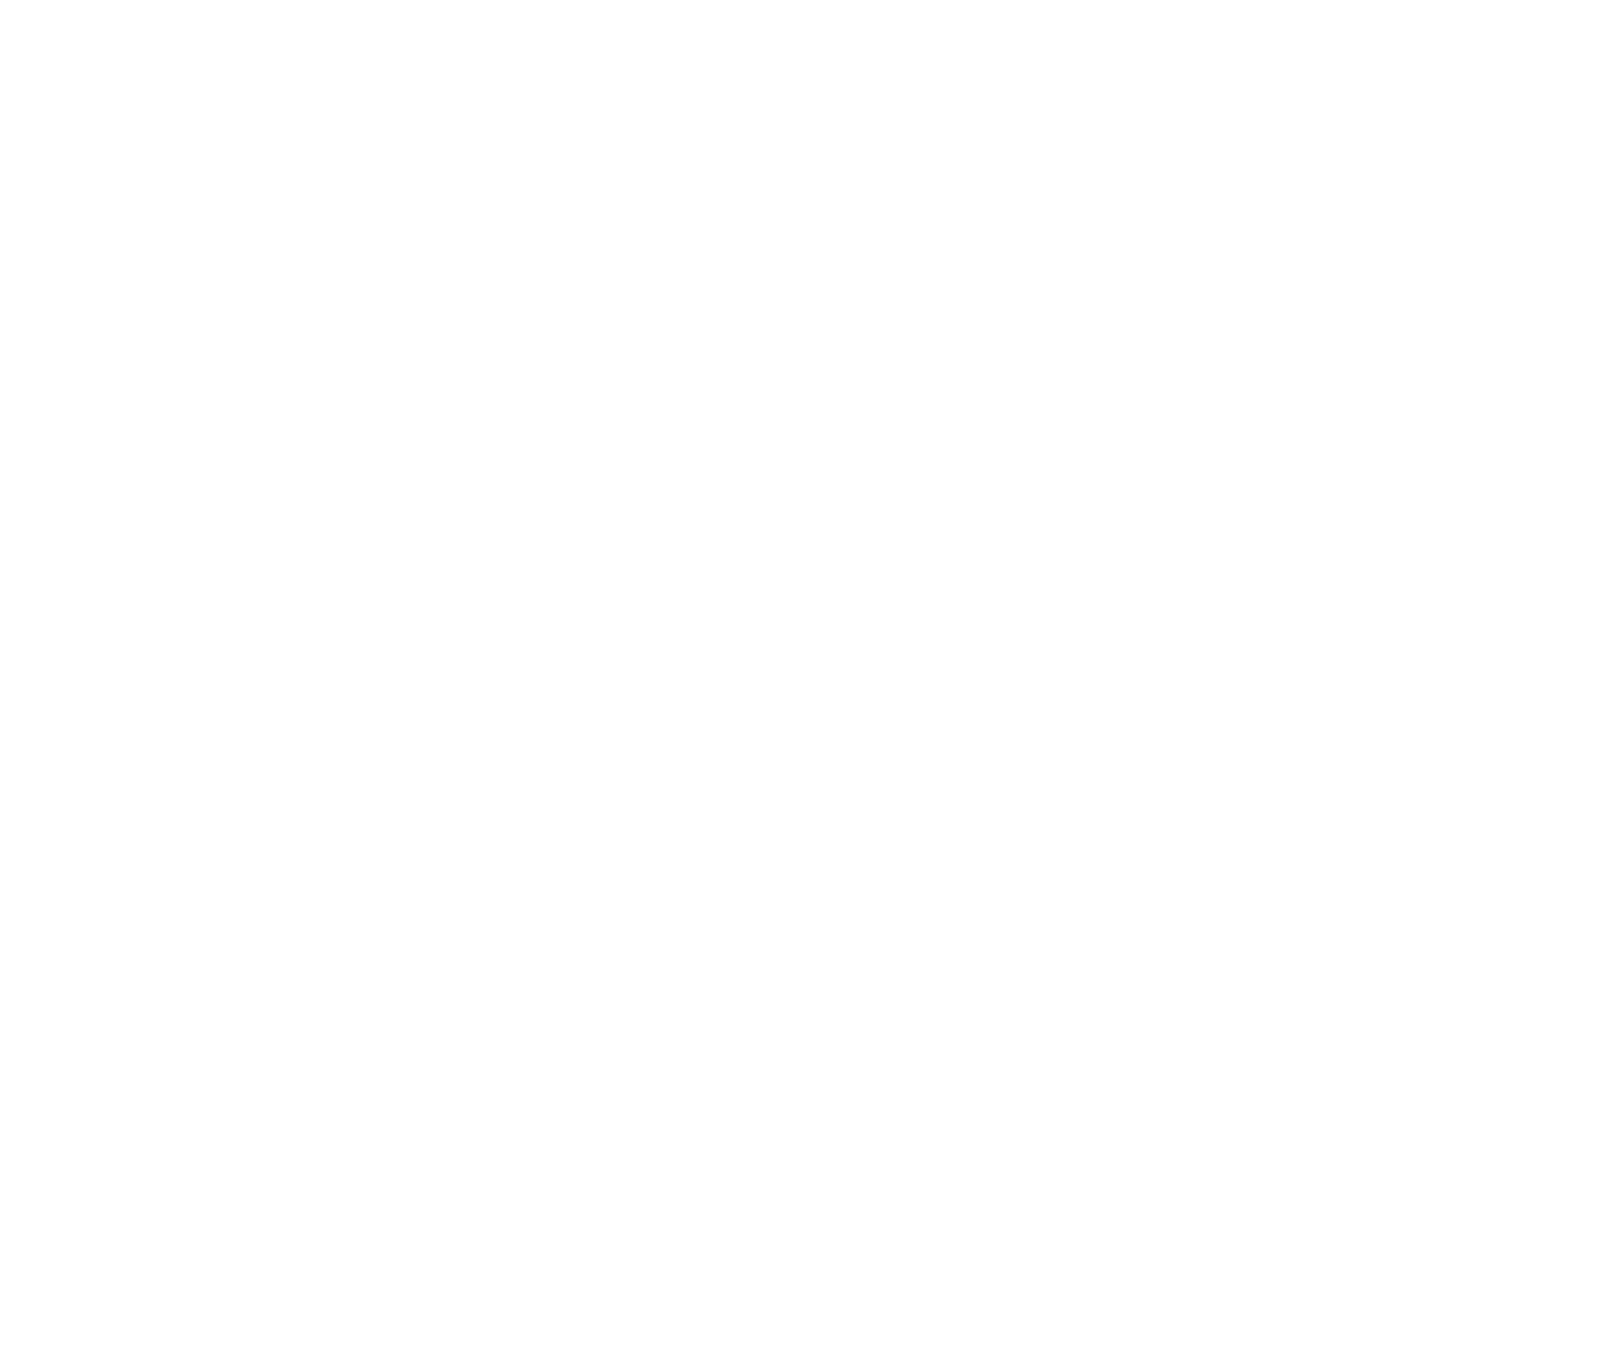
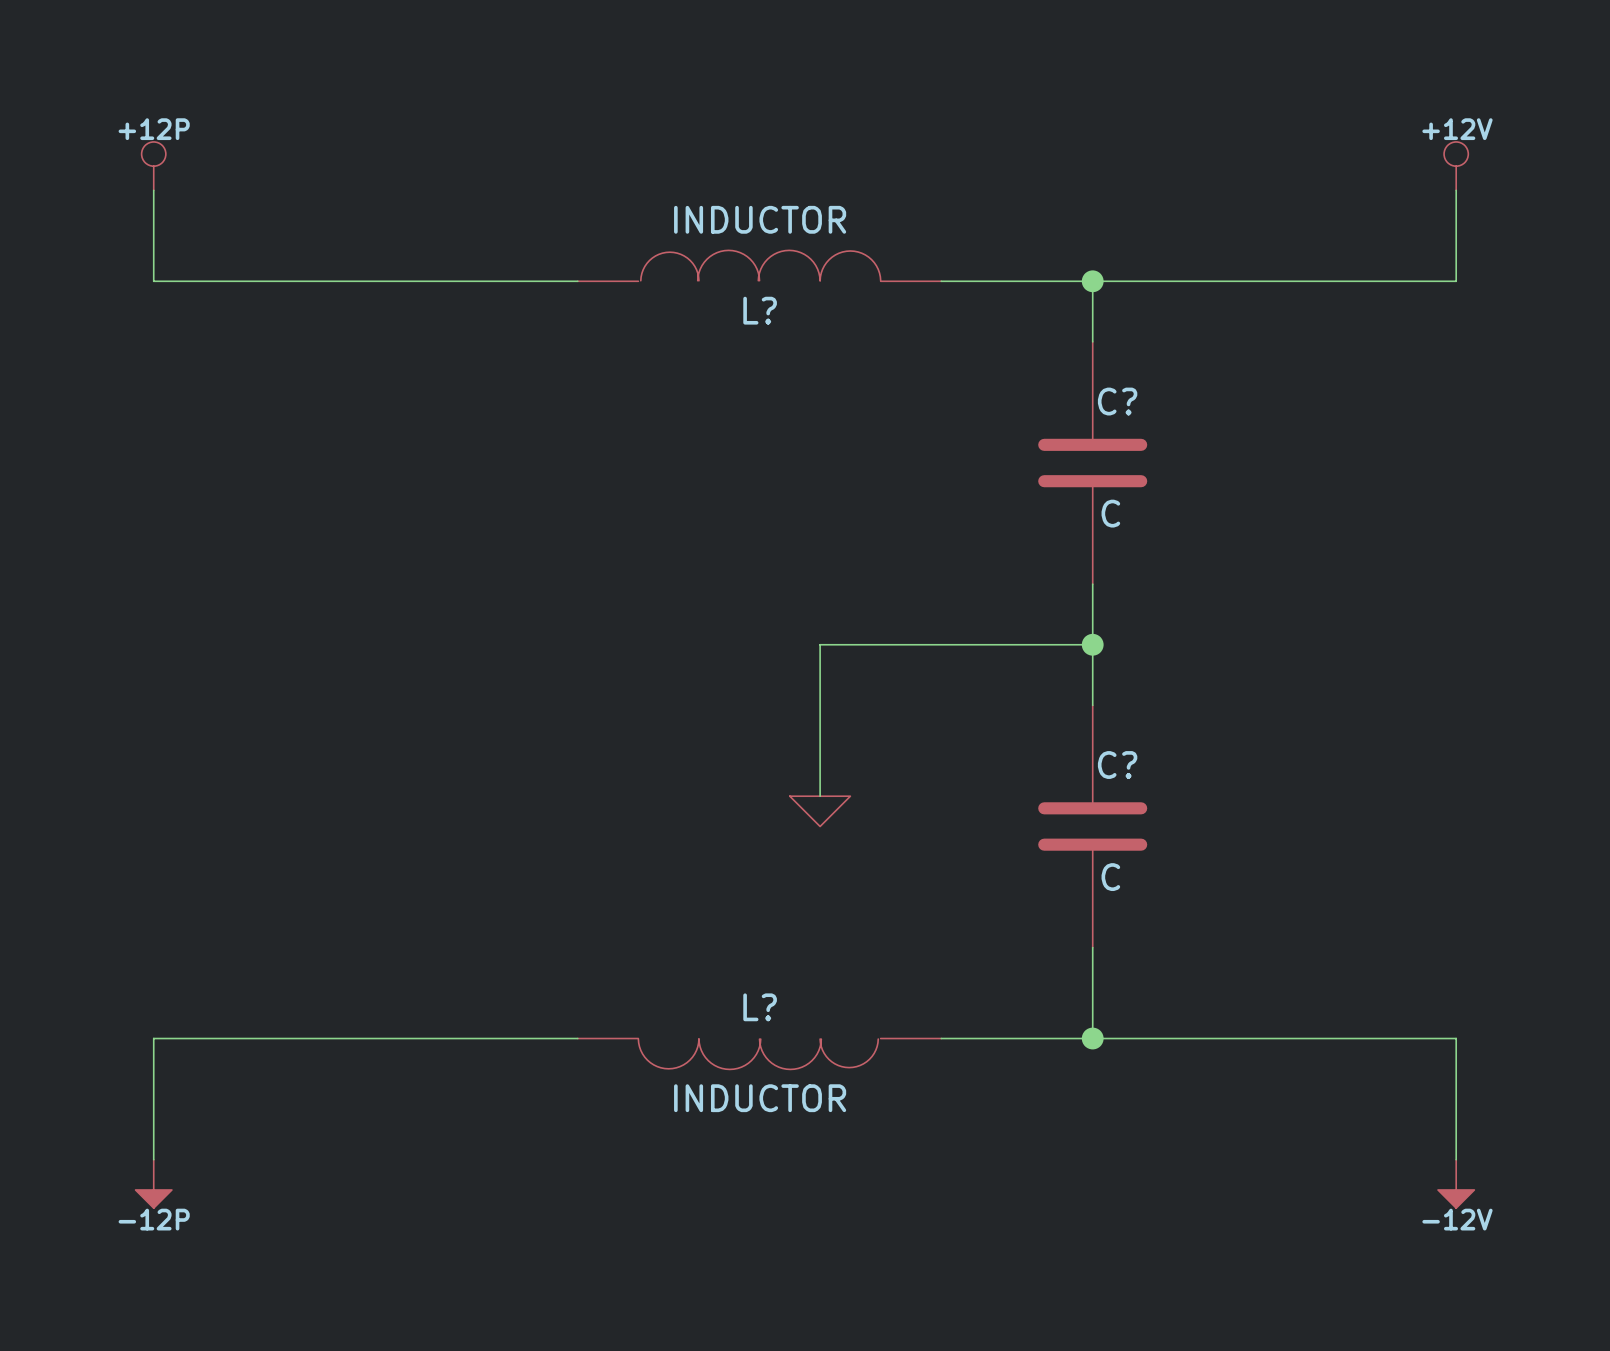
power symbol: none -> +12P (153, 166)
power symbol: none -> +12V (1456, 166)
wire: none -> (153, 190) (153, 281) (577, 281)
wire: none -> (1456, 190) (1456, 281) (941, 281)
L?: none -> INDUCTOR (759, 265)
wire: none -> (1092, 281) (1092, 341)
junction: none -> (1092, 281)
C?: none -> C (1092, 463)
wire: none -> (1092, 584) (1092, 705)
wire: none -> (1092, 644) (820, 644) (820, 796)
junction: none -> (1092, 644)
power symbol: none -> (820, 811)
C?: none -> C (1092, 826)
wire: none -> (1092, 947) (1092, 1038)
wire: none -> (577, 1038) (153, 1038) (153, 1159)
wire: none -> (941, 1038) (1456, 1038) (1456, 1159)
junction: none -> (1092, 1038)
L?: none -> INDUCTOR (759, 1053)
power symbol: none -> -12P (153, 1183)
power symbol: none -> -12V (1456, 1183)

